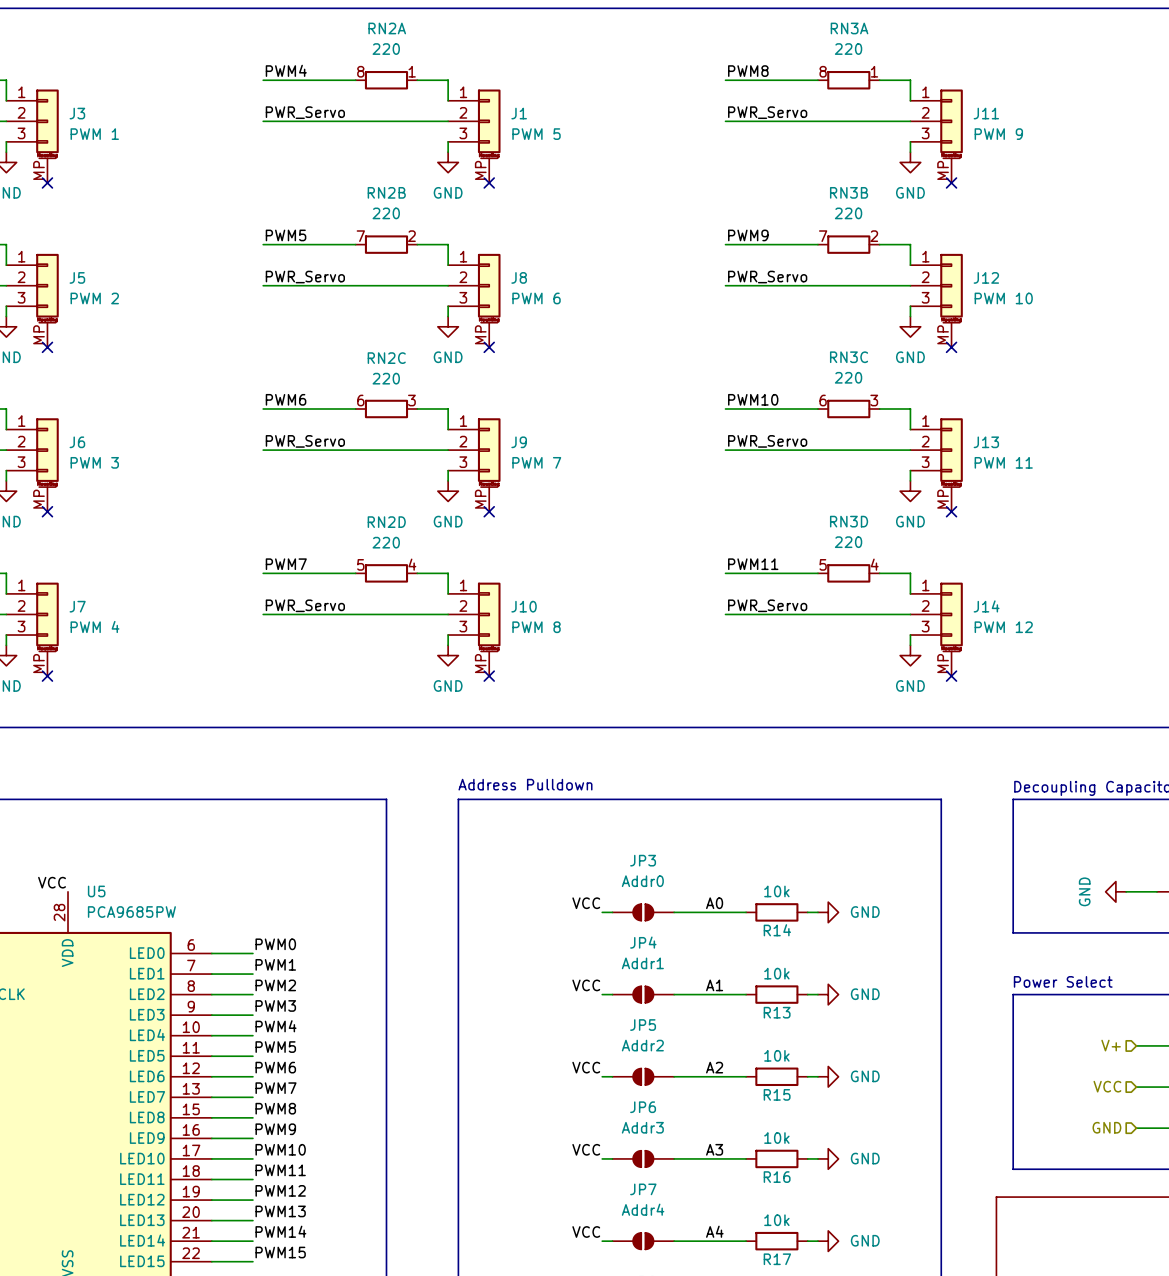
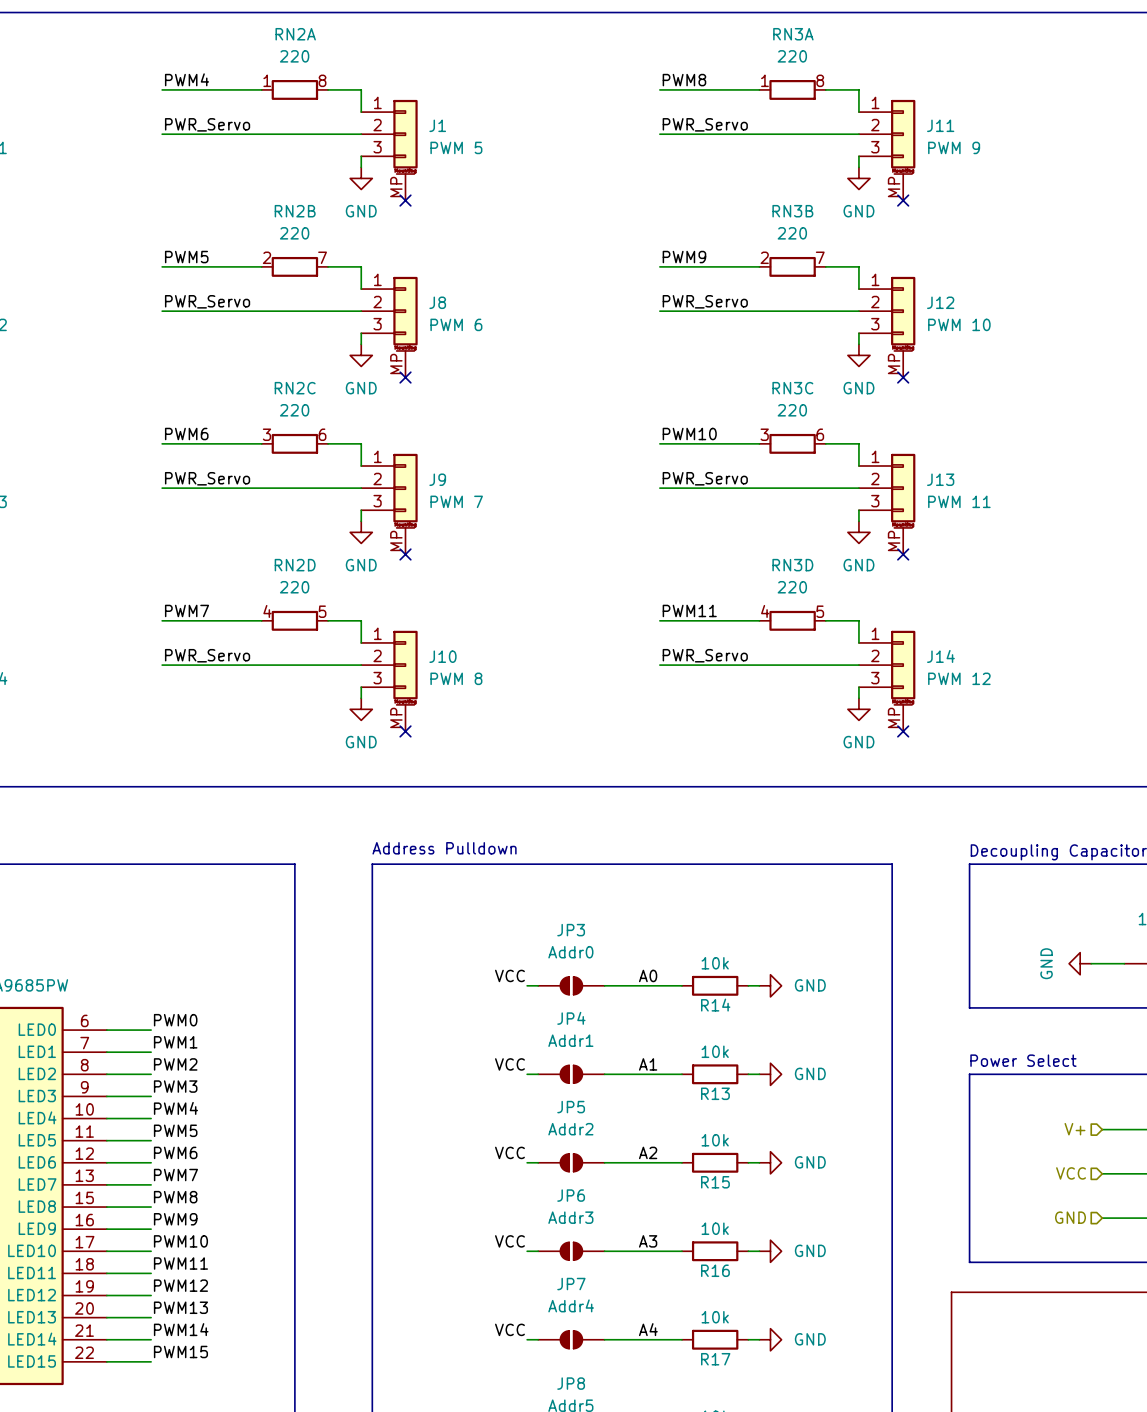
RN2A rotation: 0° (386, 80) -> 180° (294, 89)
RN3A rotation: 0° (848, 80) -> 180° (792, 89)
RN2B rotation: 0° (386, 244) -> 180° (294, 266)
RN3B rotation: 0° (848, 244) -> 180° (792, 266)
RN2C rotation: 0° (386, 408) -> 180° (294, 443)
RN3C rotation: 0° (848, 408) -> 180° (792, 443)
RN2D rotation: 0° (386, 573) -> 180° (294, 620)
RN3D rotation: 0° (848, 573) -> 180° (792, 620)

